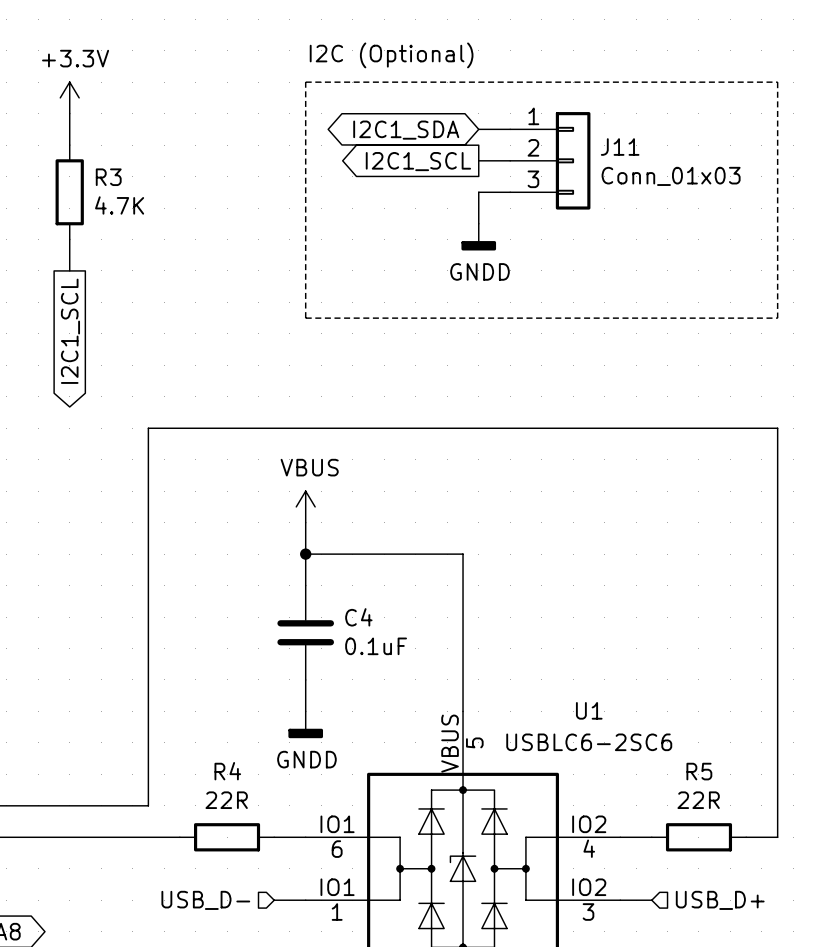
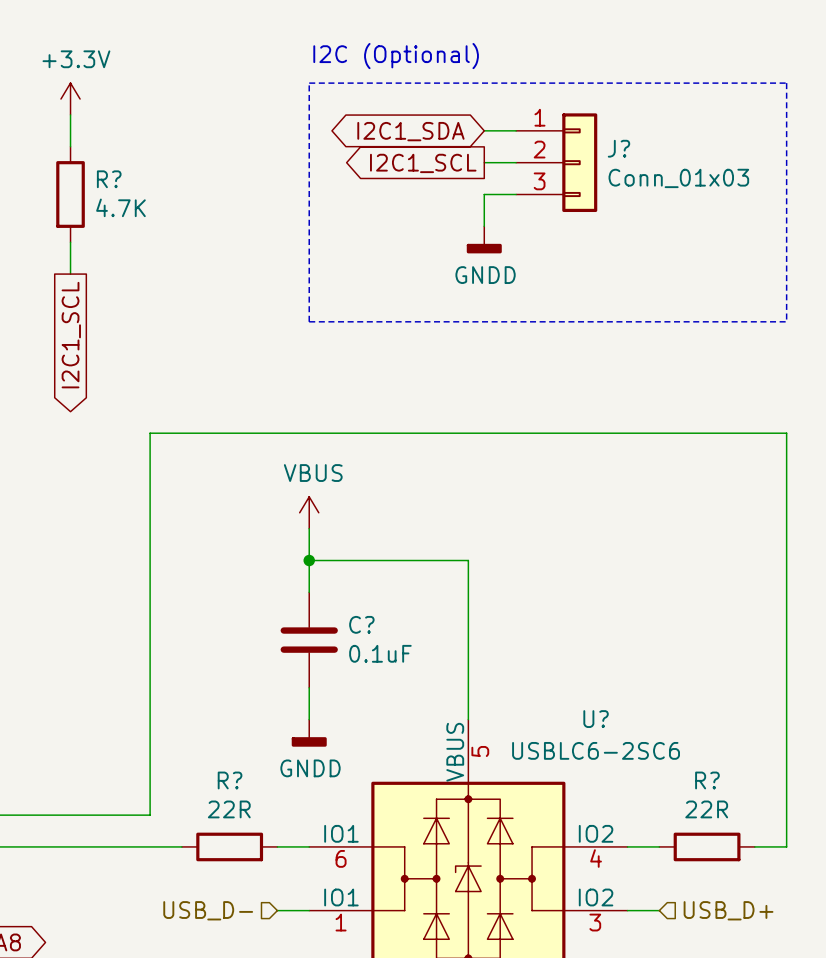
J11 name: J11 (620, 147) -> J? (618, 148)
R3 name: R3 (108, 177) -> R? (109, 179)
C4 name: C4 (358, 617) -> C? (361, 624)
U1 name: U1 (589, 710) -> U? (596, 719)
R4 name: R4 (227, 771) -> R? (230, 780)
R5 name: R5 (699, 771) -> R? (707, 780)

